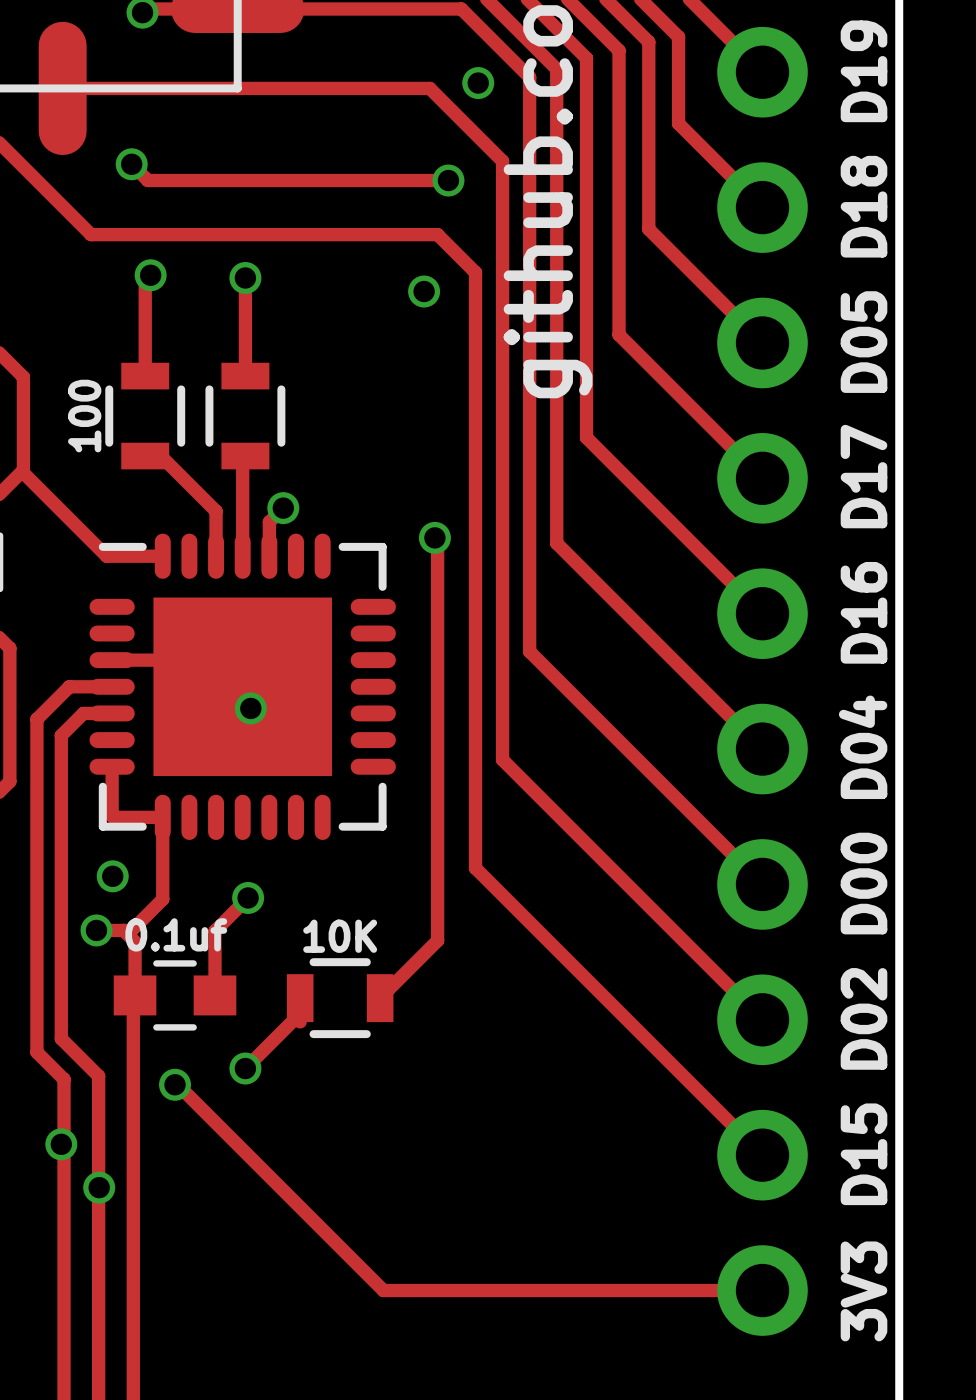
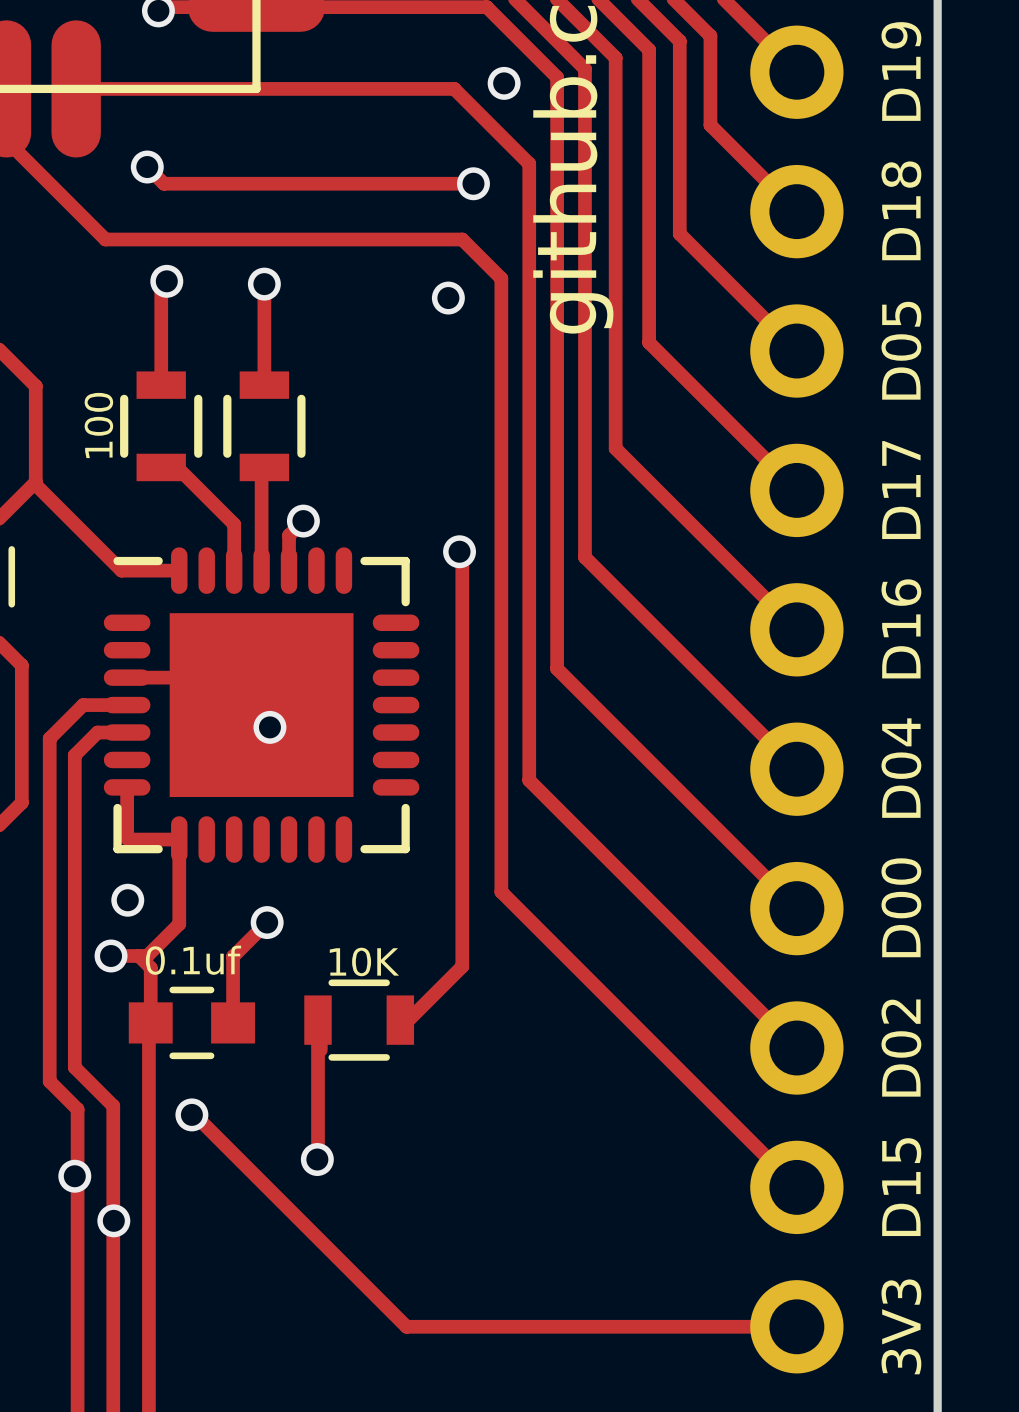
part footprint: [286, 958, 394, 1039] -> [304, 979, 415, 1061]
track: none -> (318, 1020) (318, 1158)
track: (300, 1013) (245, 1068) -> none
via position: (245, 1068) -> (317, 1159)

